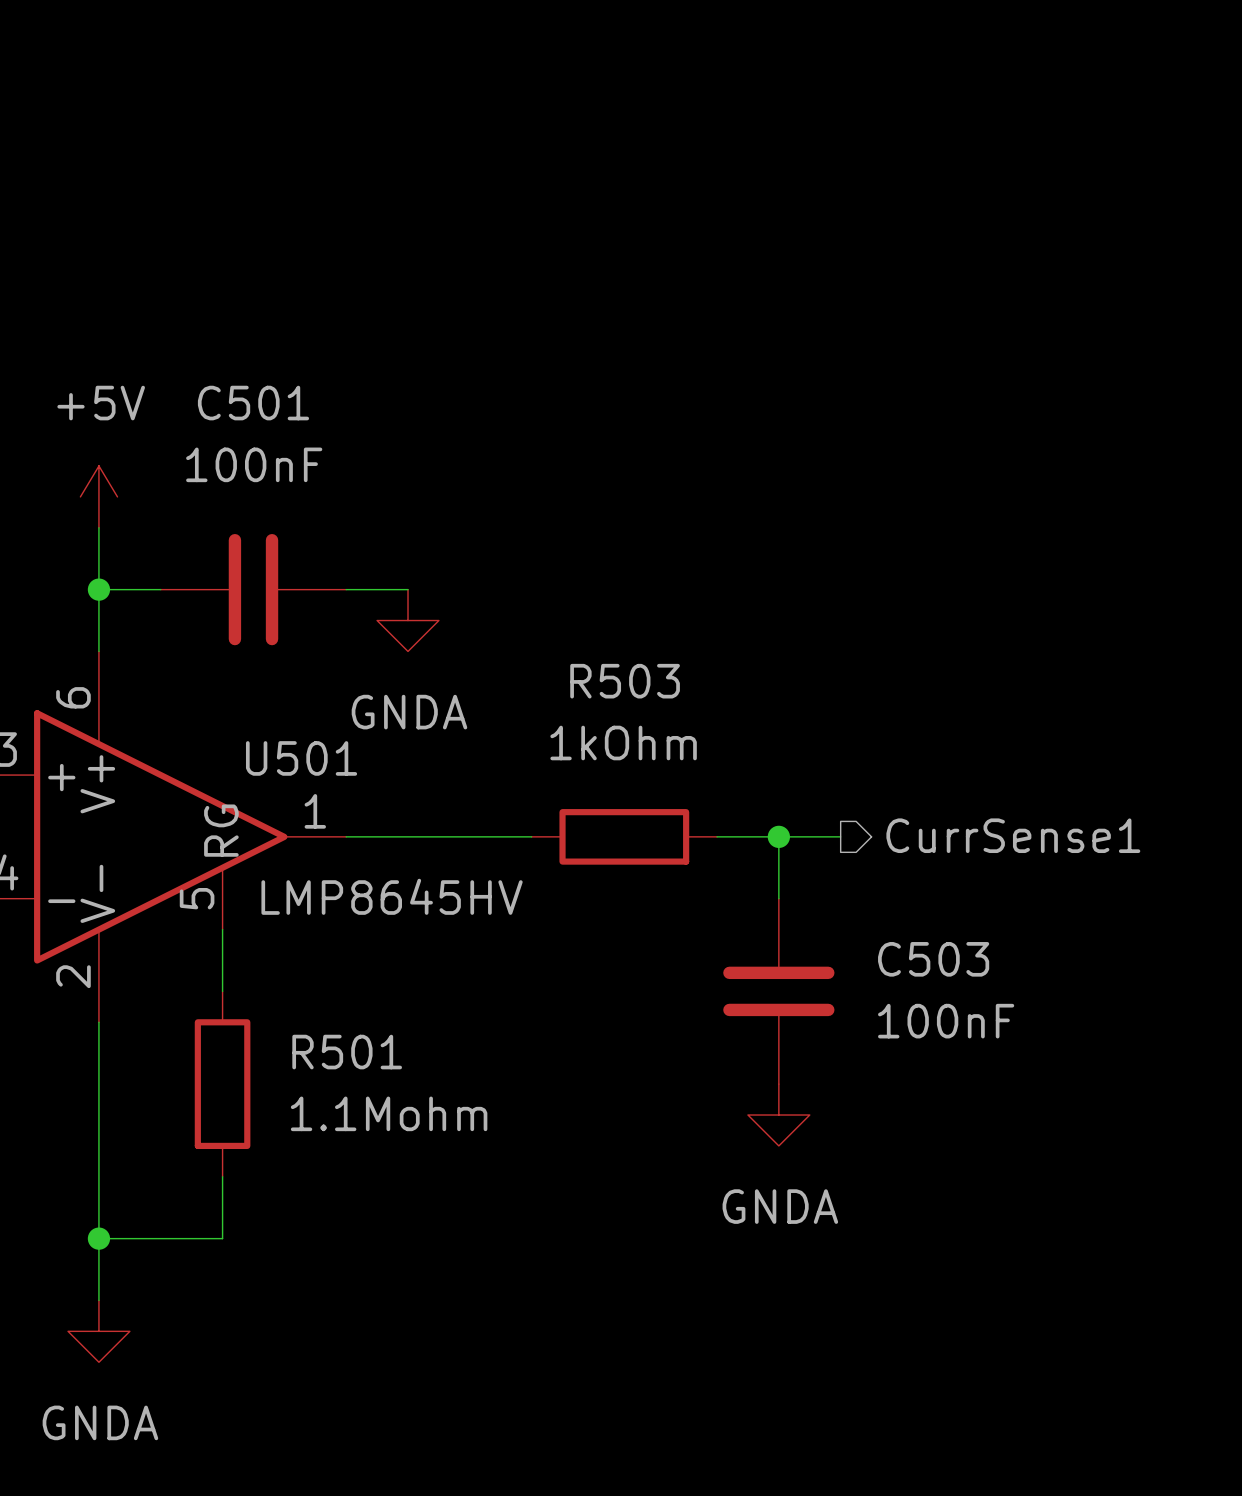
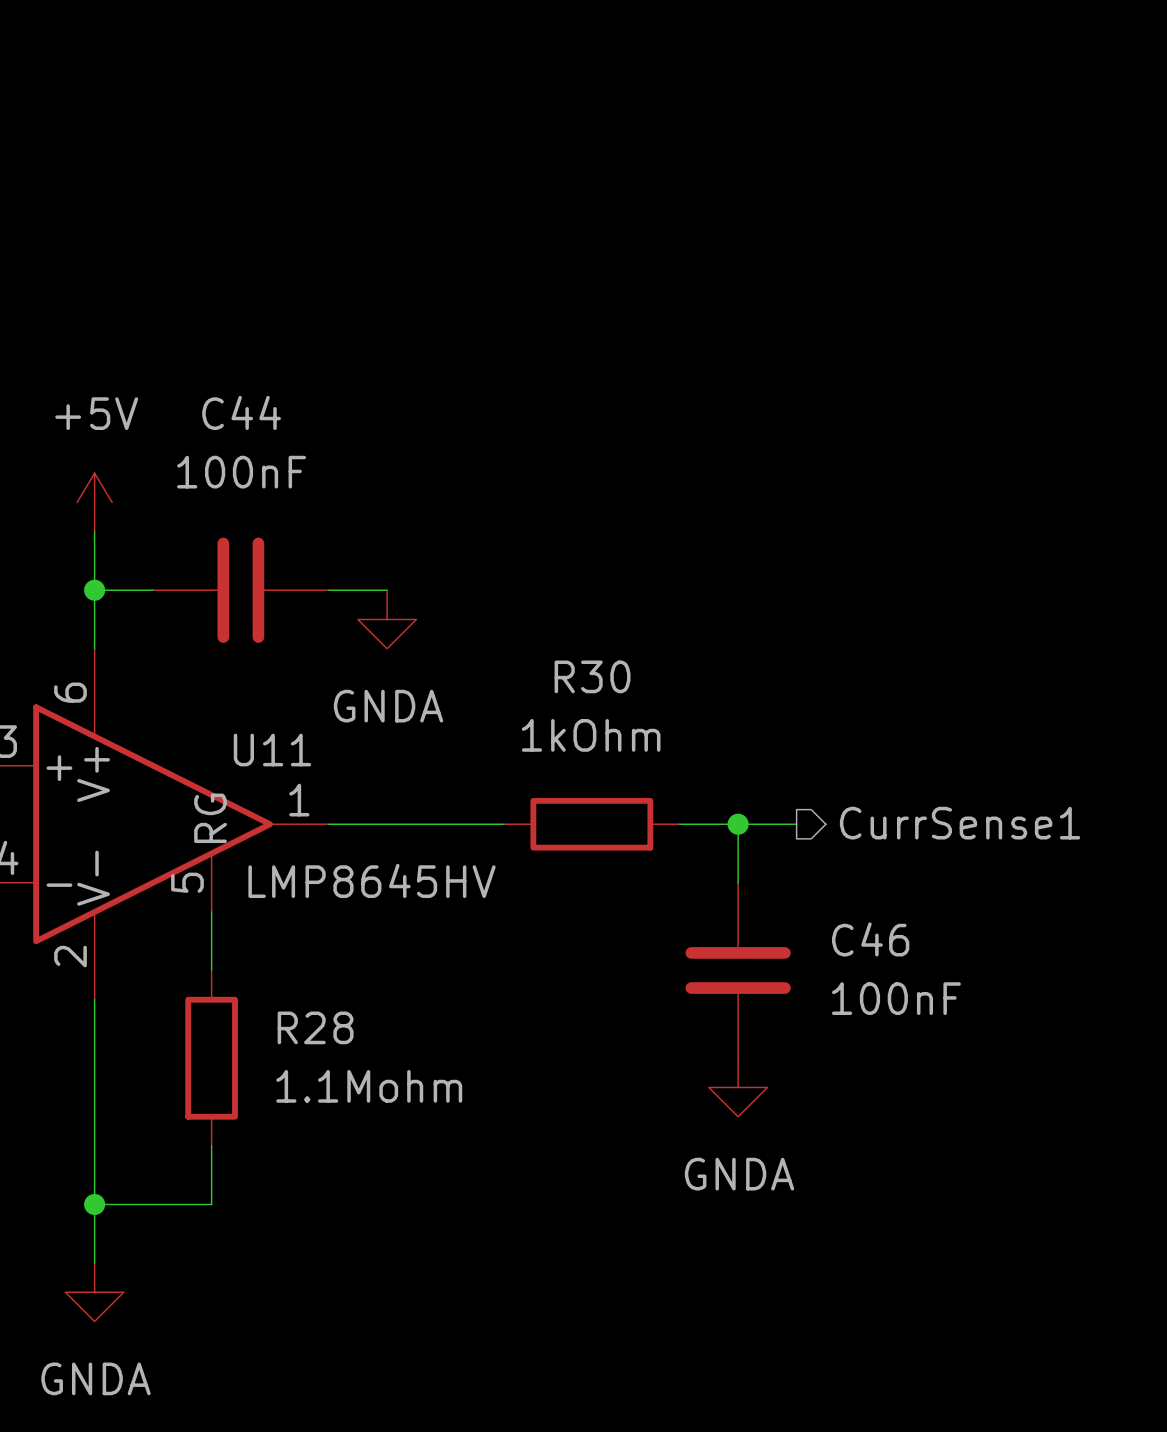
C501 name: C501 (253, 403) -> C44 (241, 412)
R503 name: R503 (625, 681) -> R30 (592, 676)
U501 name: U501 (301, 758) -> U11 (272, 750)
C503 name: C503 (933, 959) -> C46 (870, 939)
R501 name: R501 (347, 1052) -> R28 (315, 1027)

